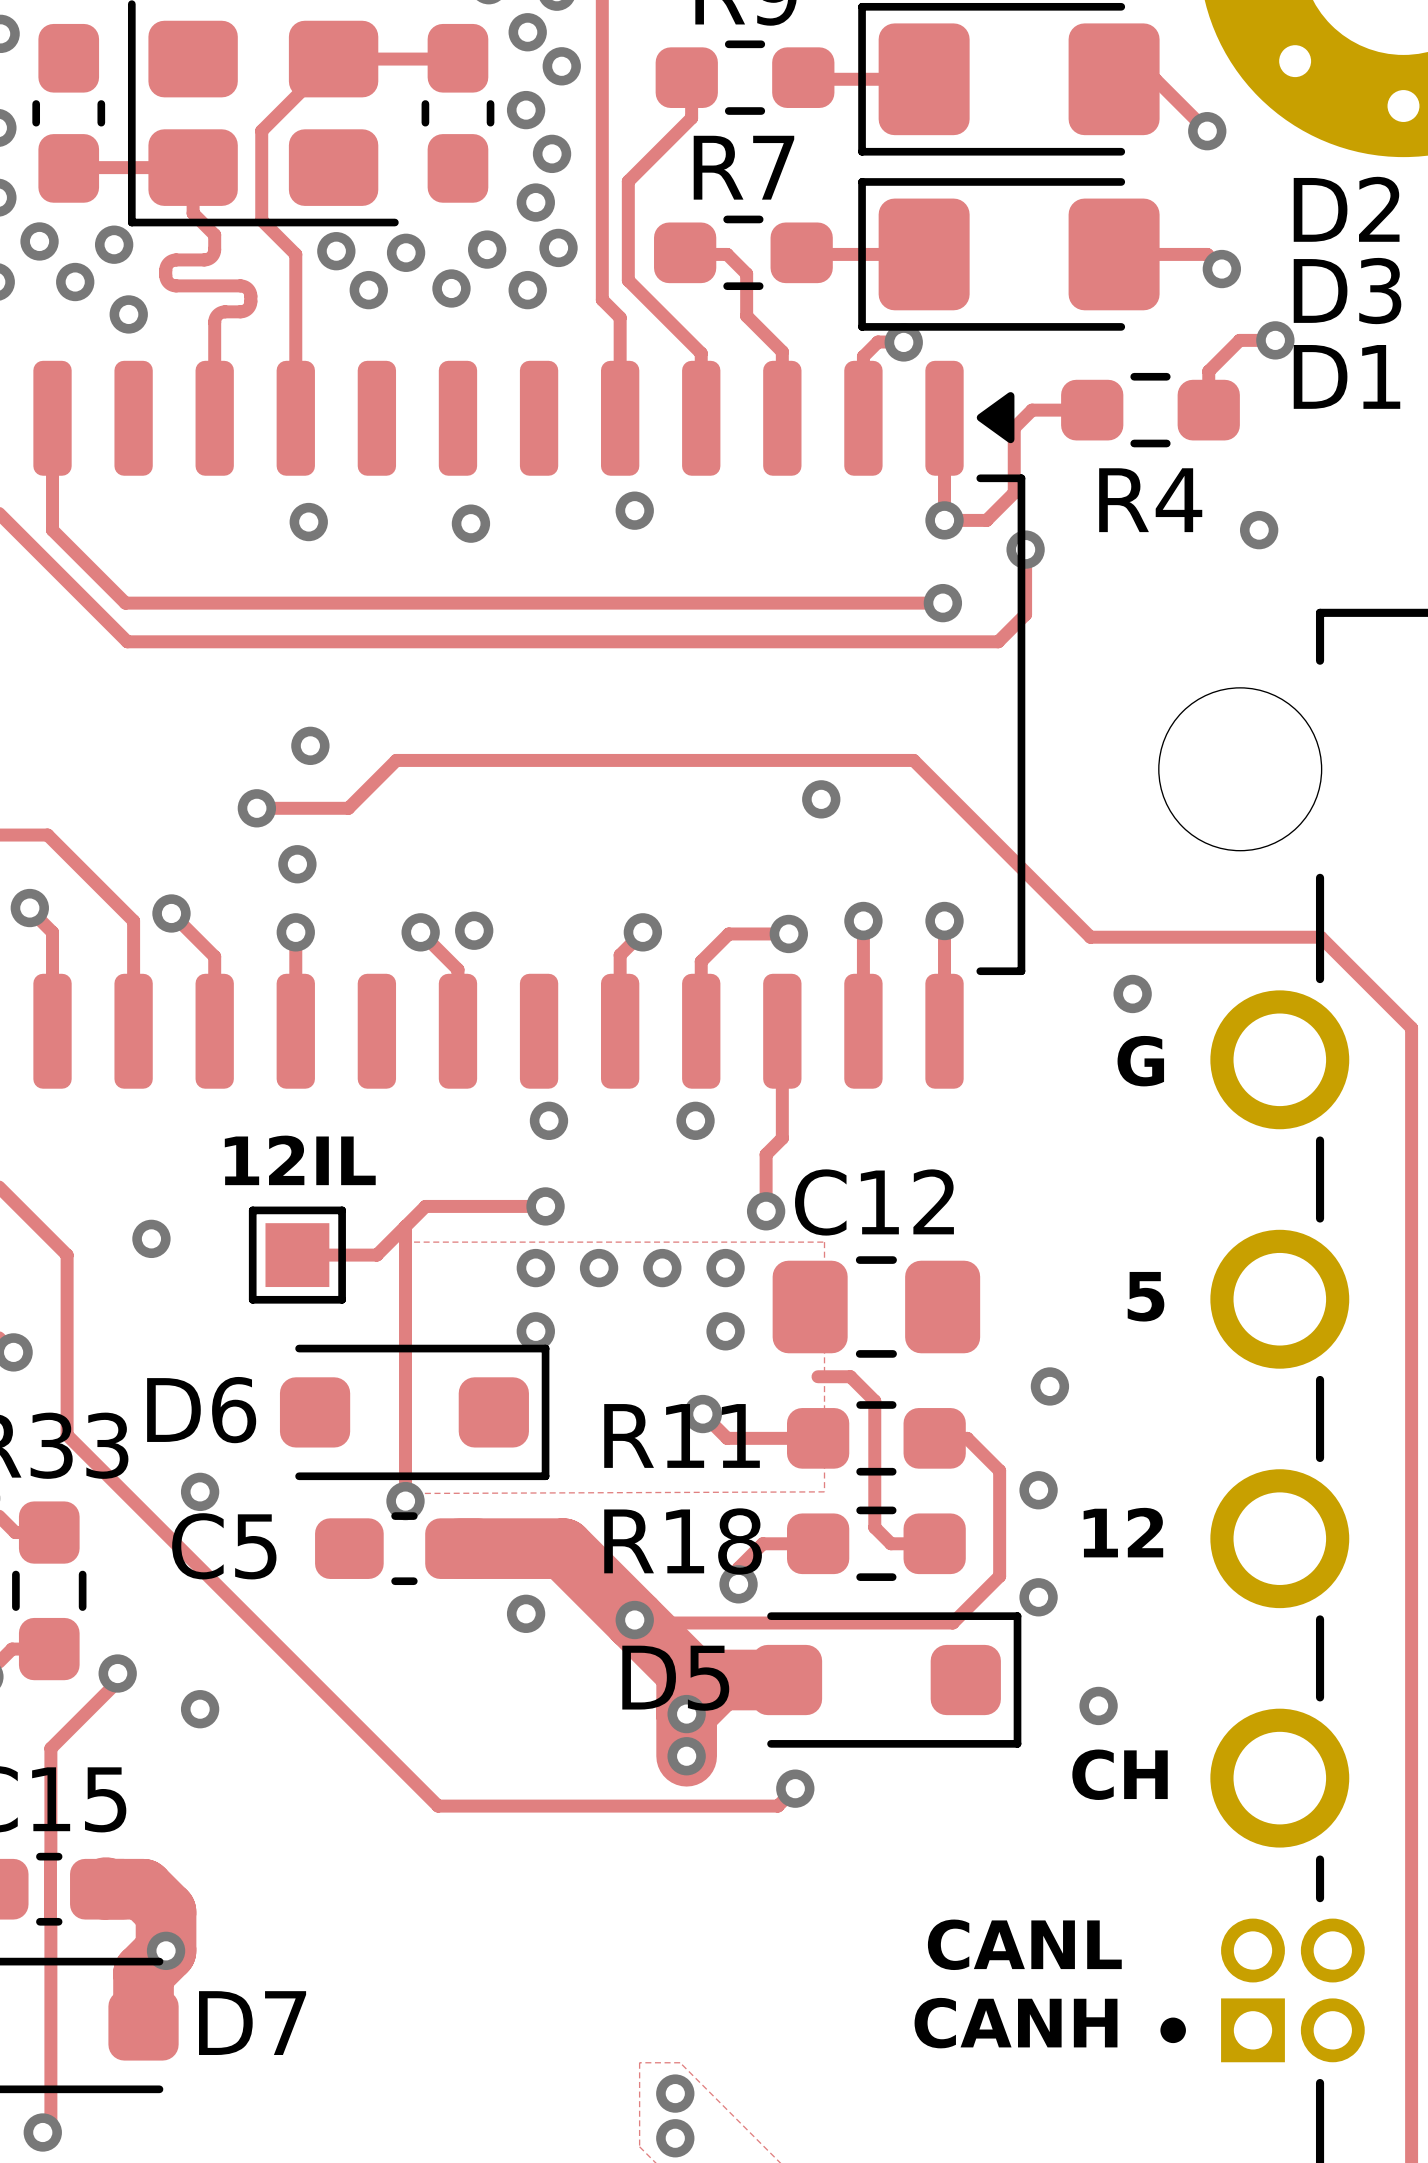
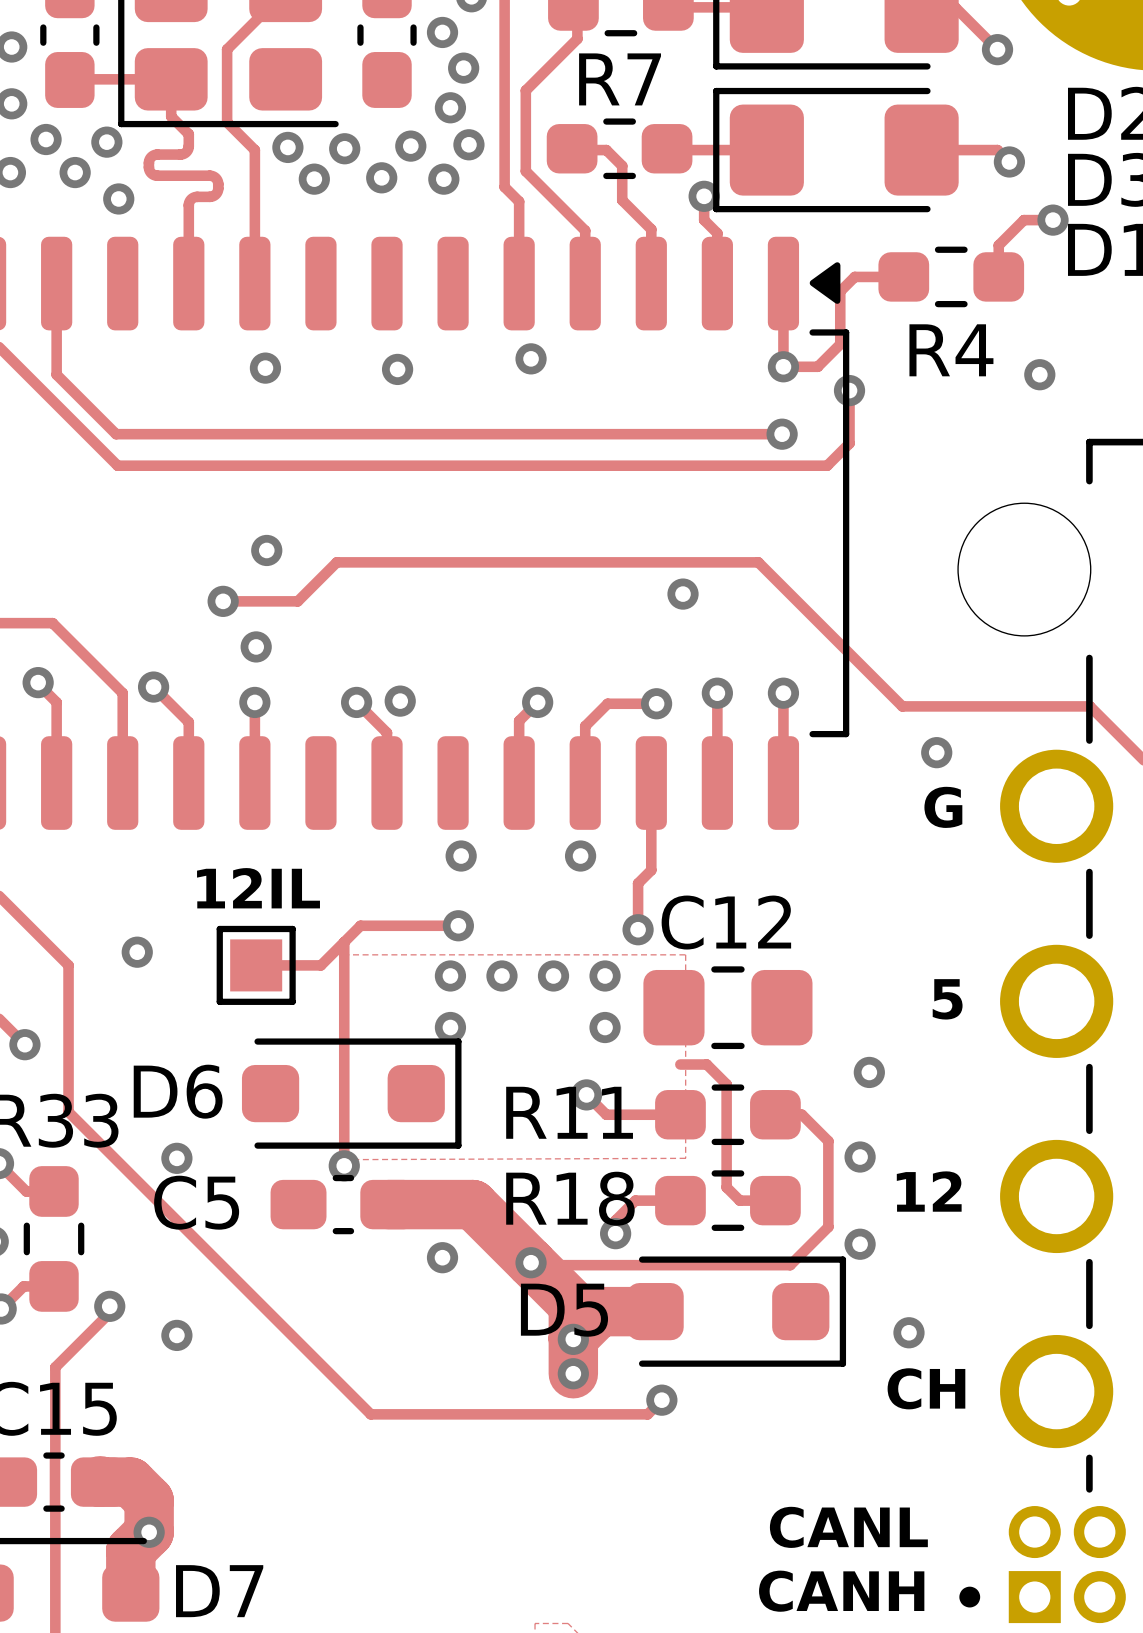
track: (903, 342) (878, 342) (863, 356) -> (704, 196) (704, 220) (717, 233)
via position: (903, 342) -> (704, 196)

